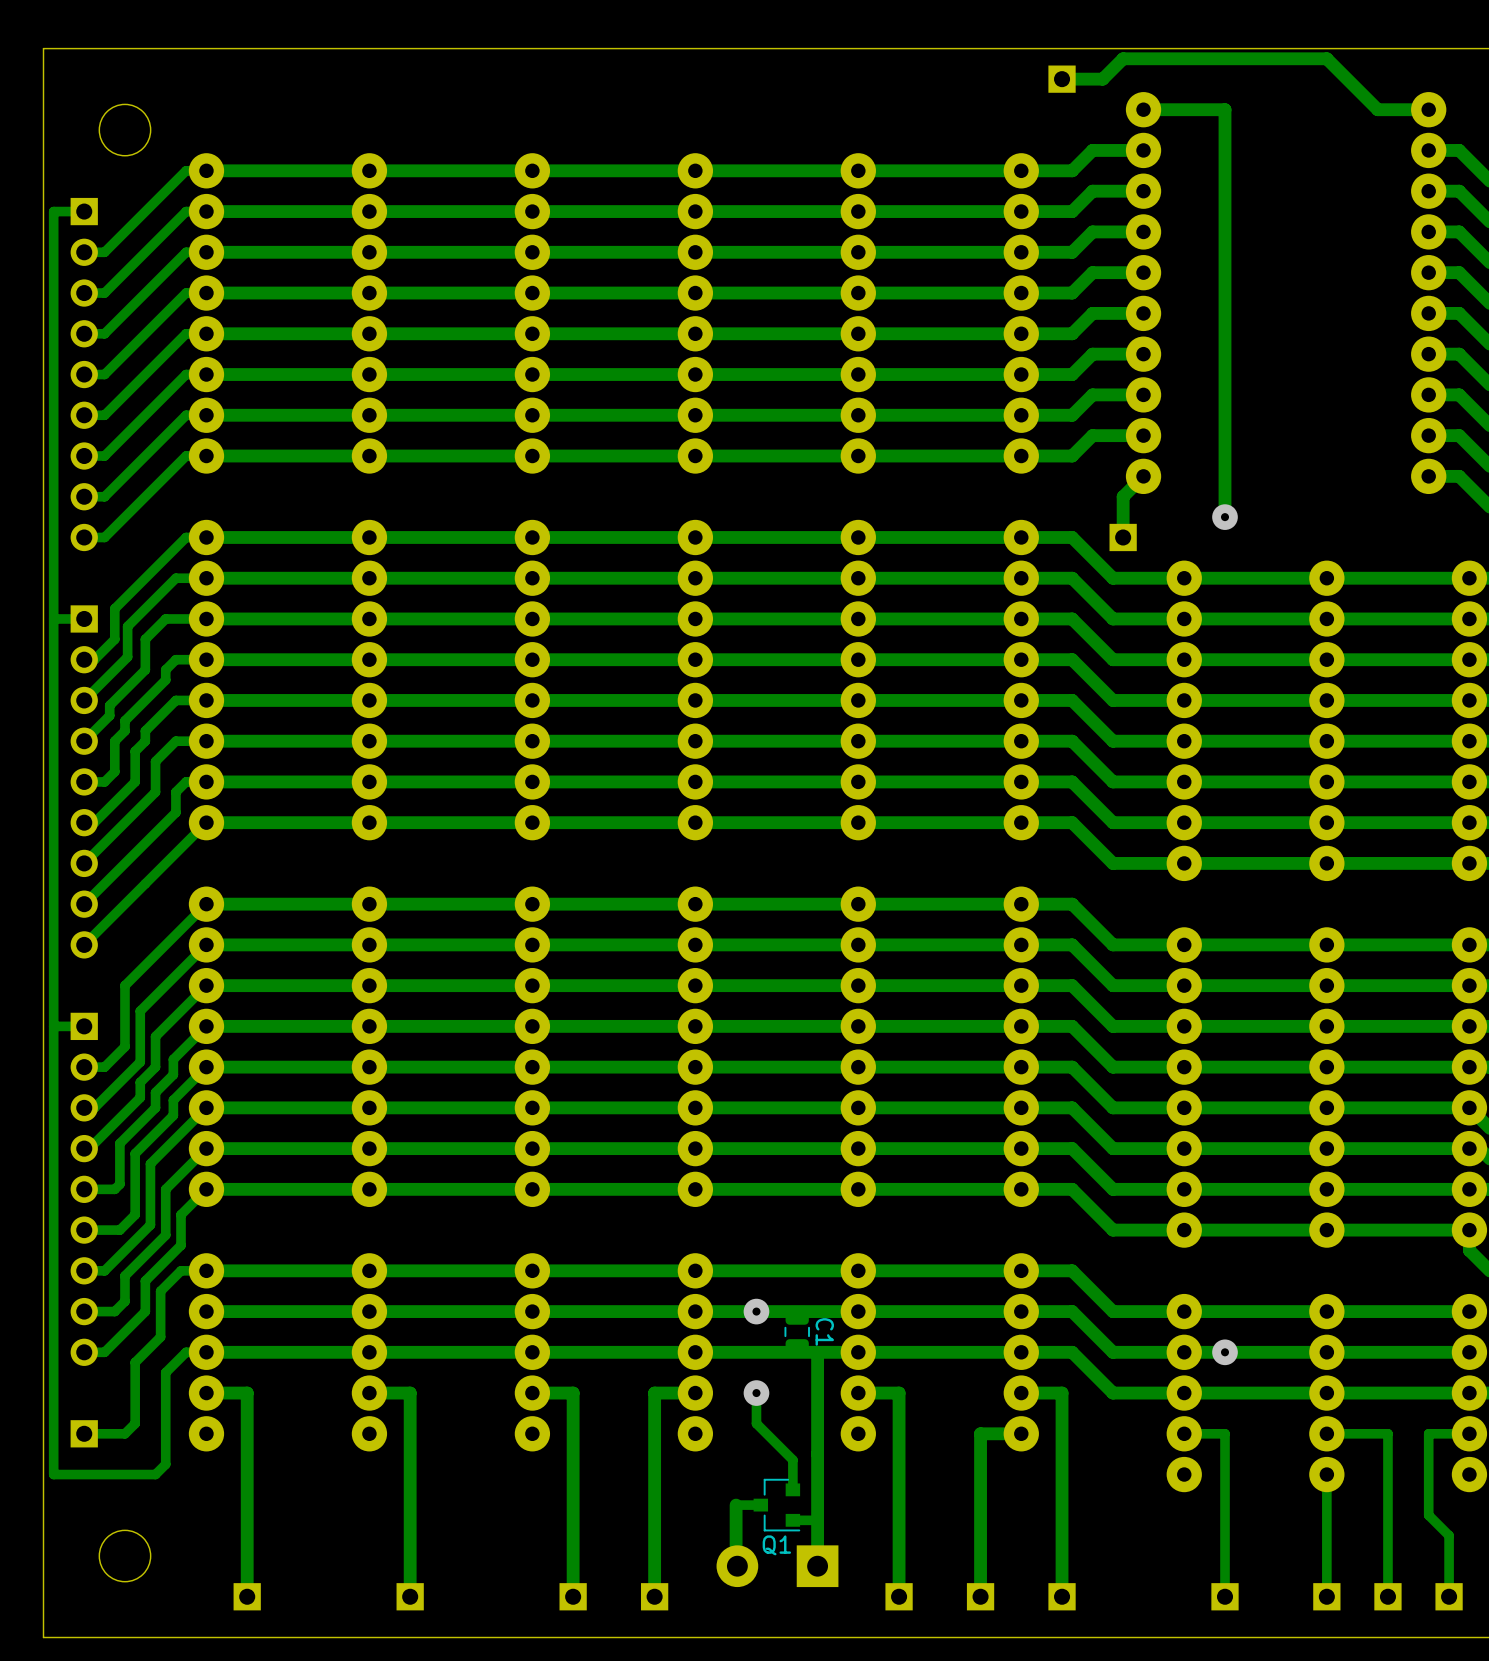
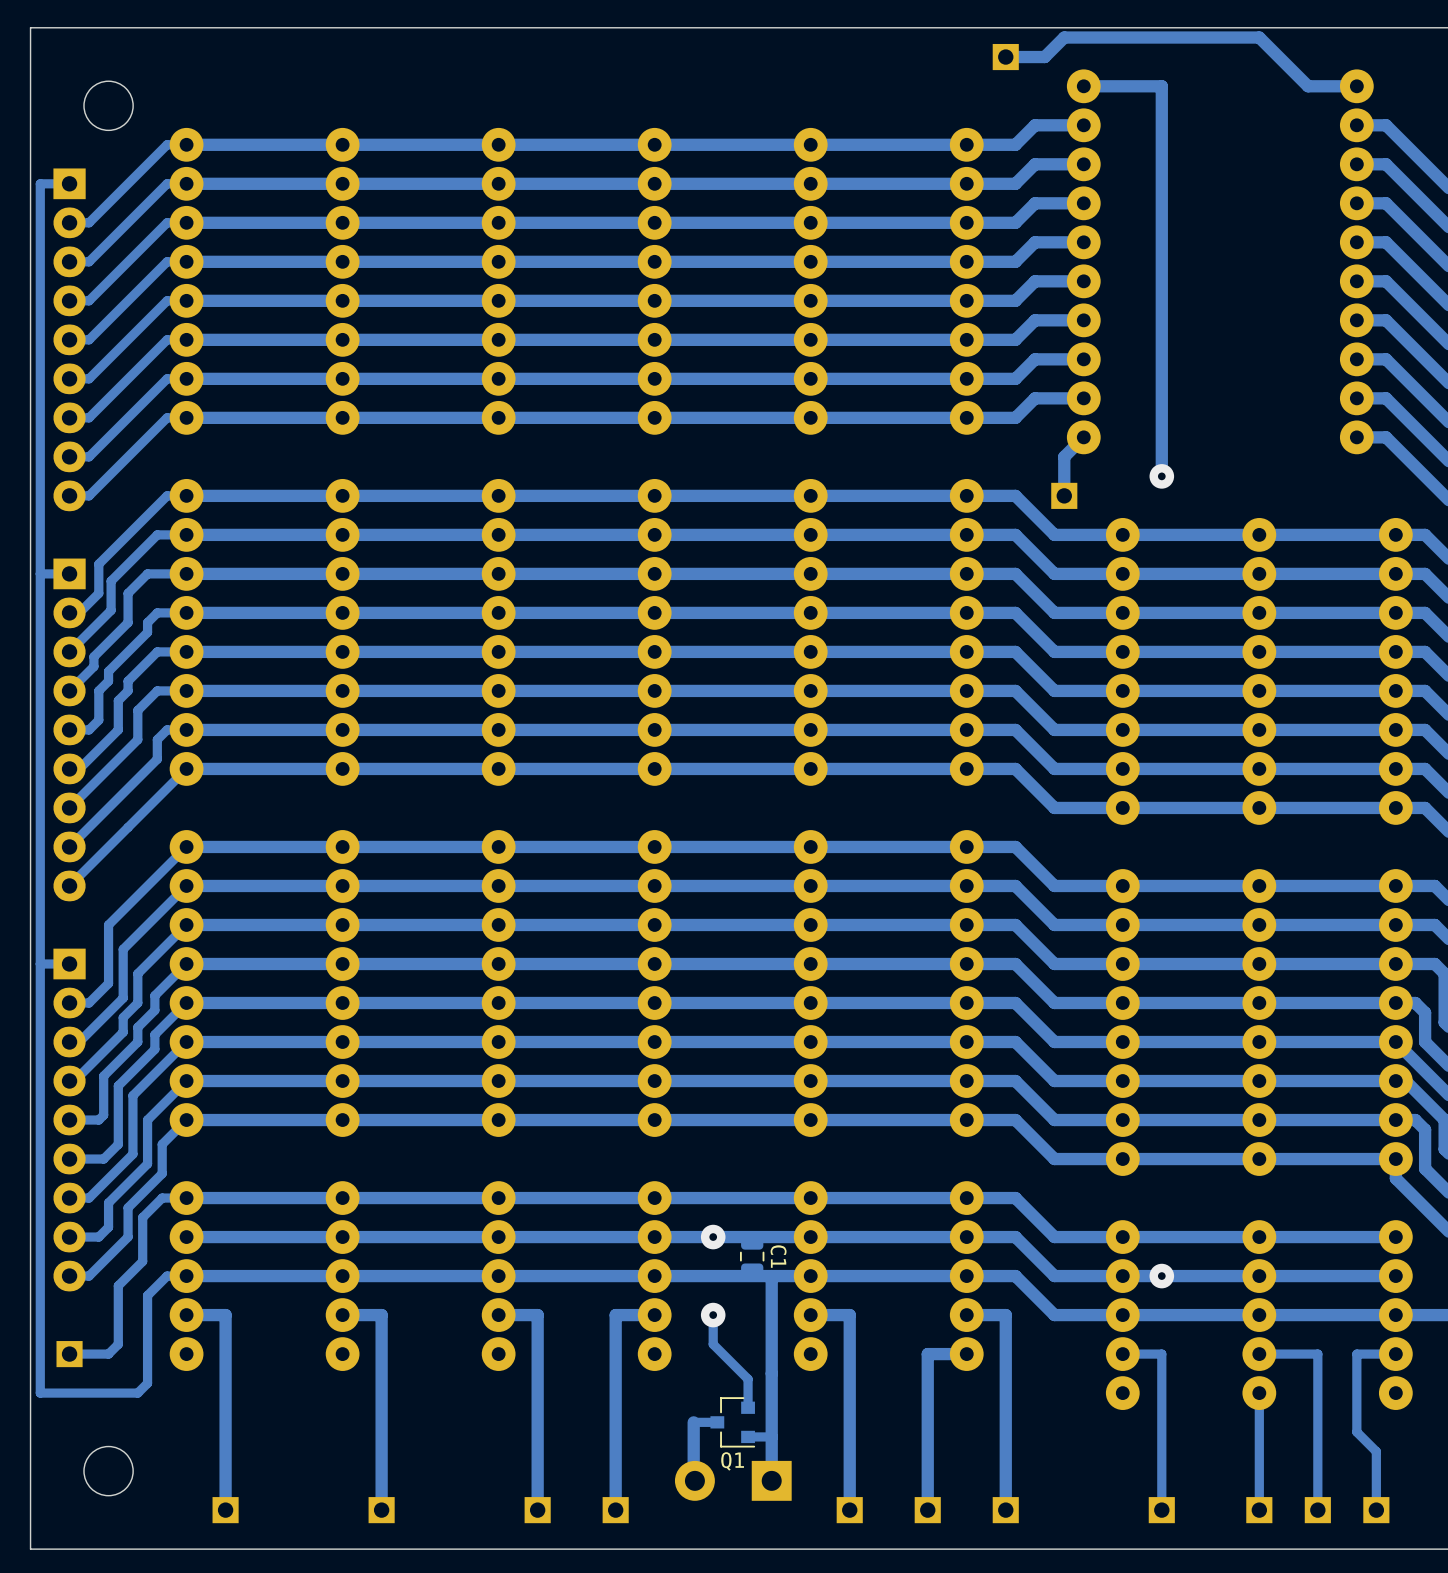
part footprint: [70, 197, 98, 552] -> [53, 168, 86, 512]
part footprint: [70, 605, 98, 959] -> [53, 558, 86, 902]
part footprint: [70, 1012, 98, 1366] -> [53, 948, 86, 1292]

